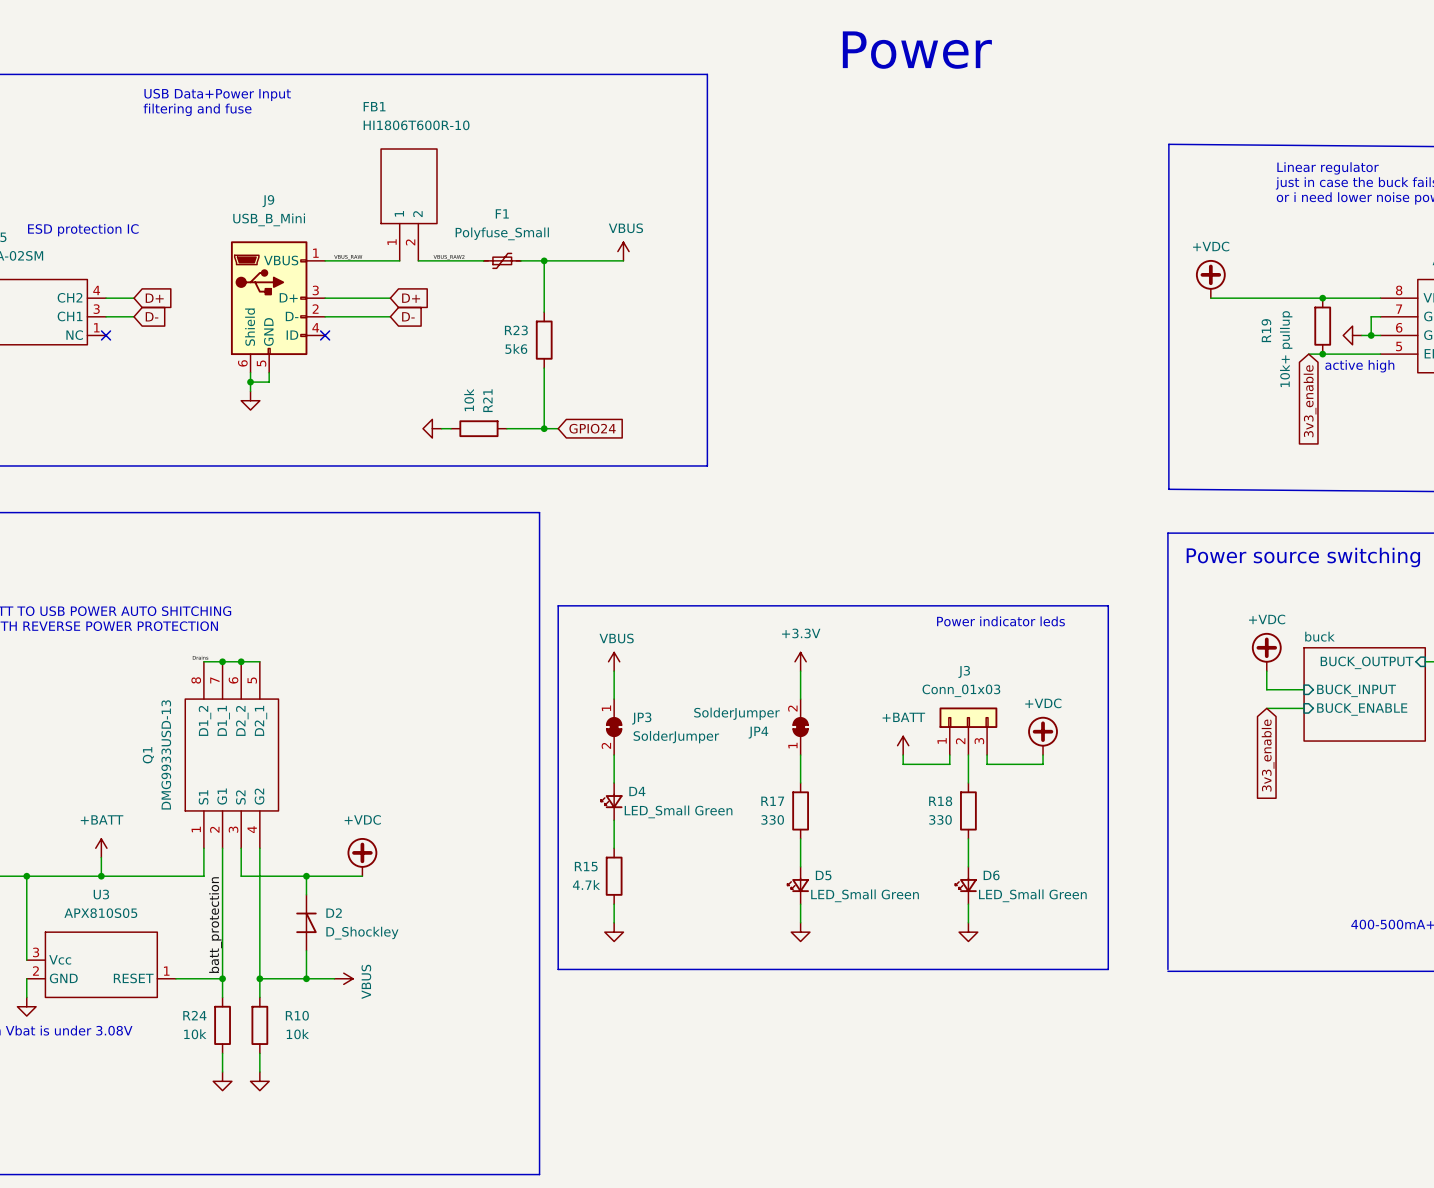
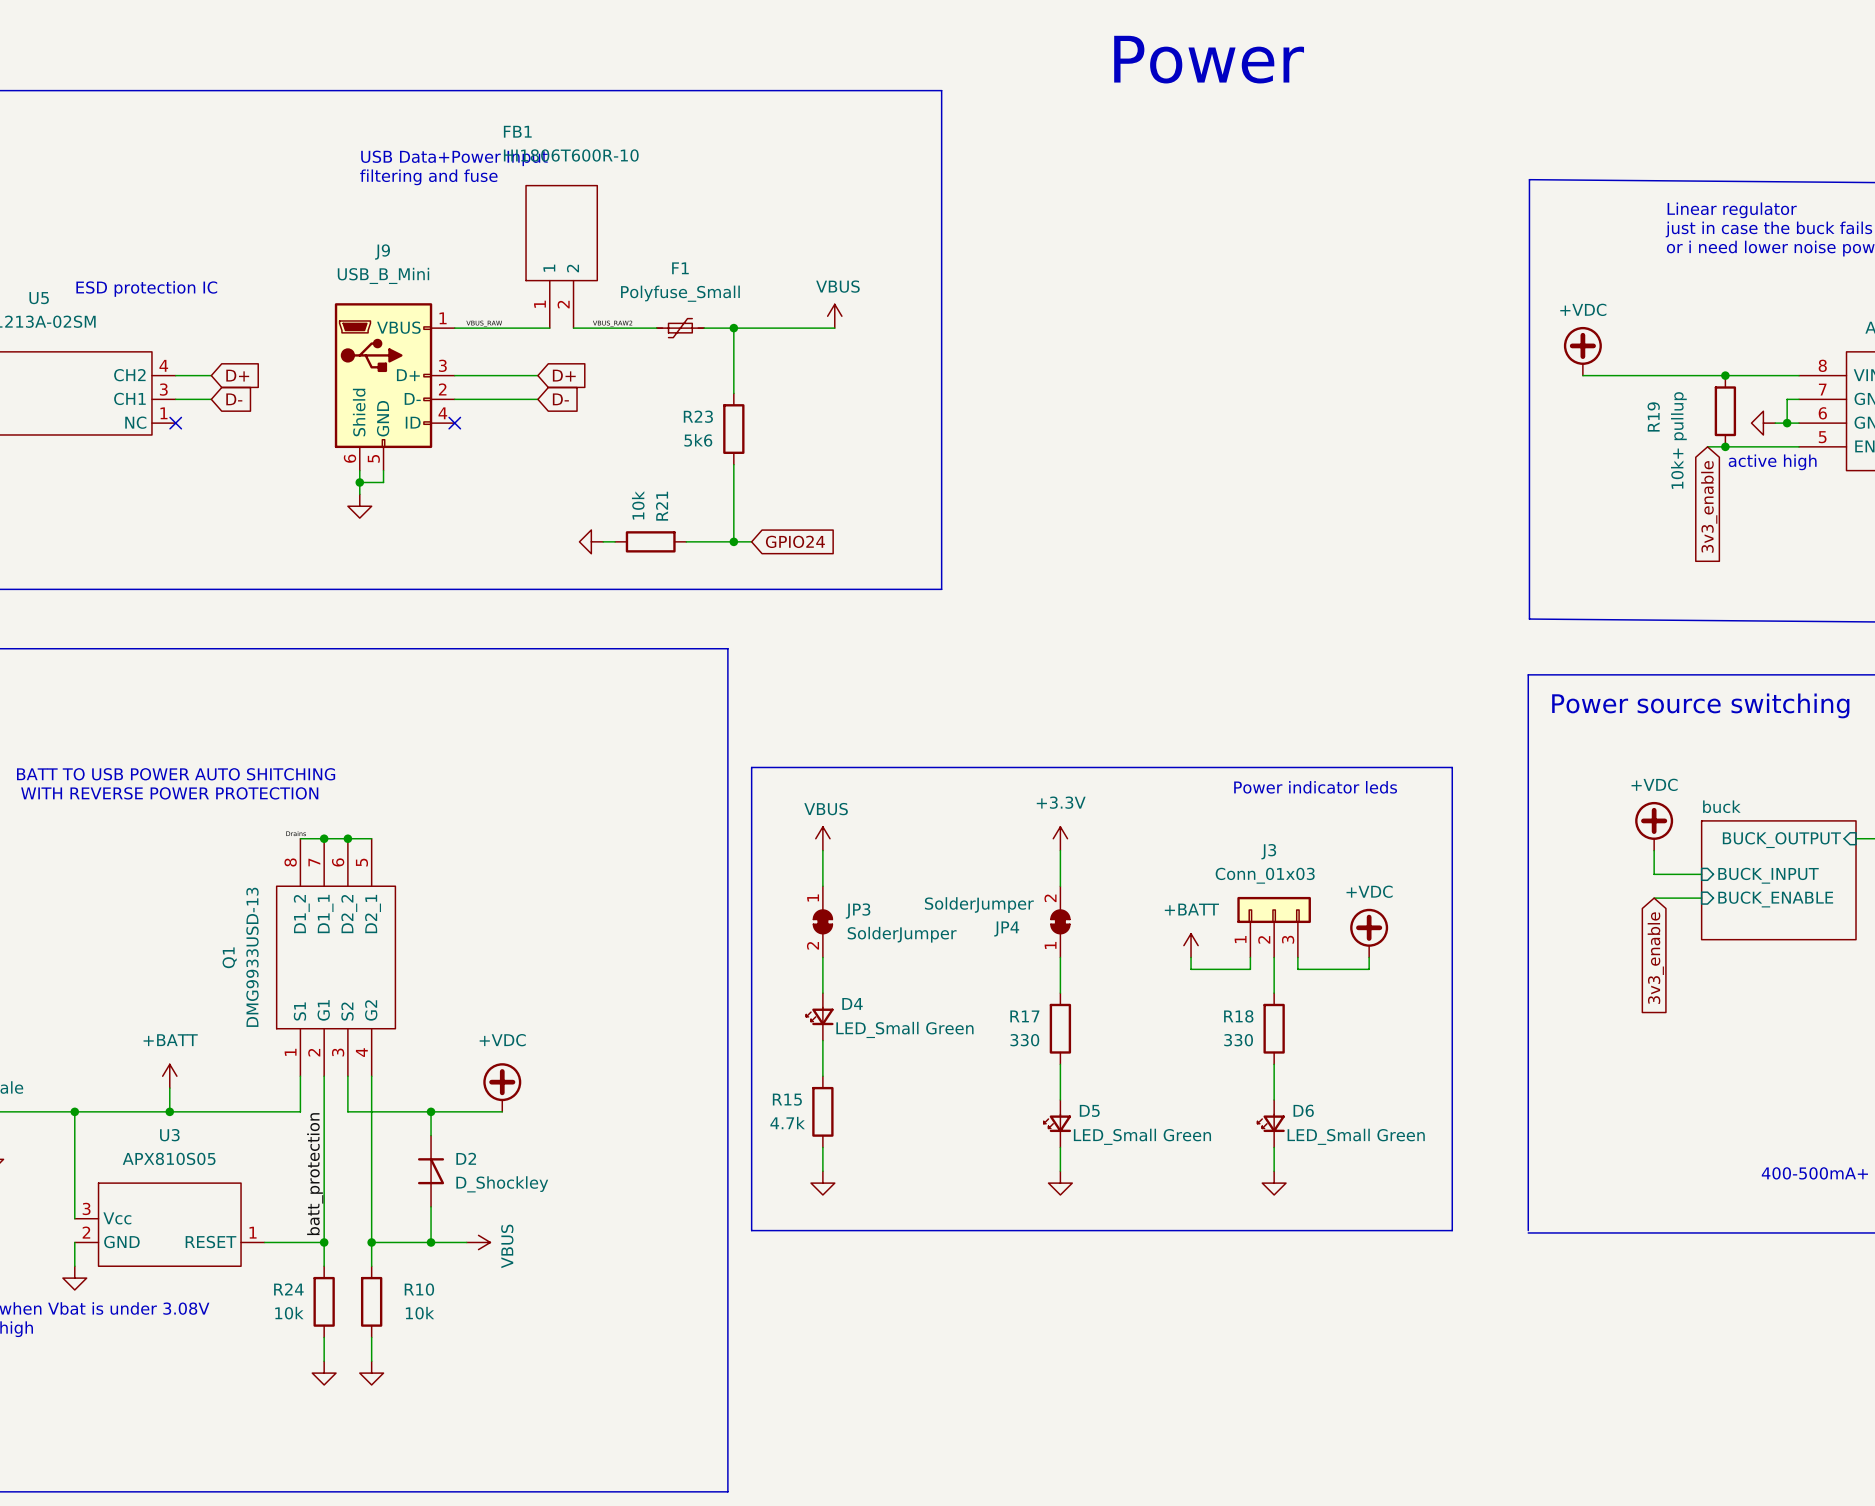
text position: USB Data+Power Input (217, 94) -> USB Data+Power Input (454, 158)
text position: filtering and fuse (197, 109) -> filtering and fuse (428, 177)

